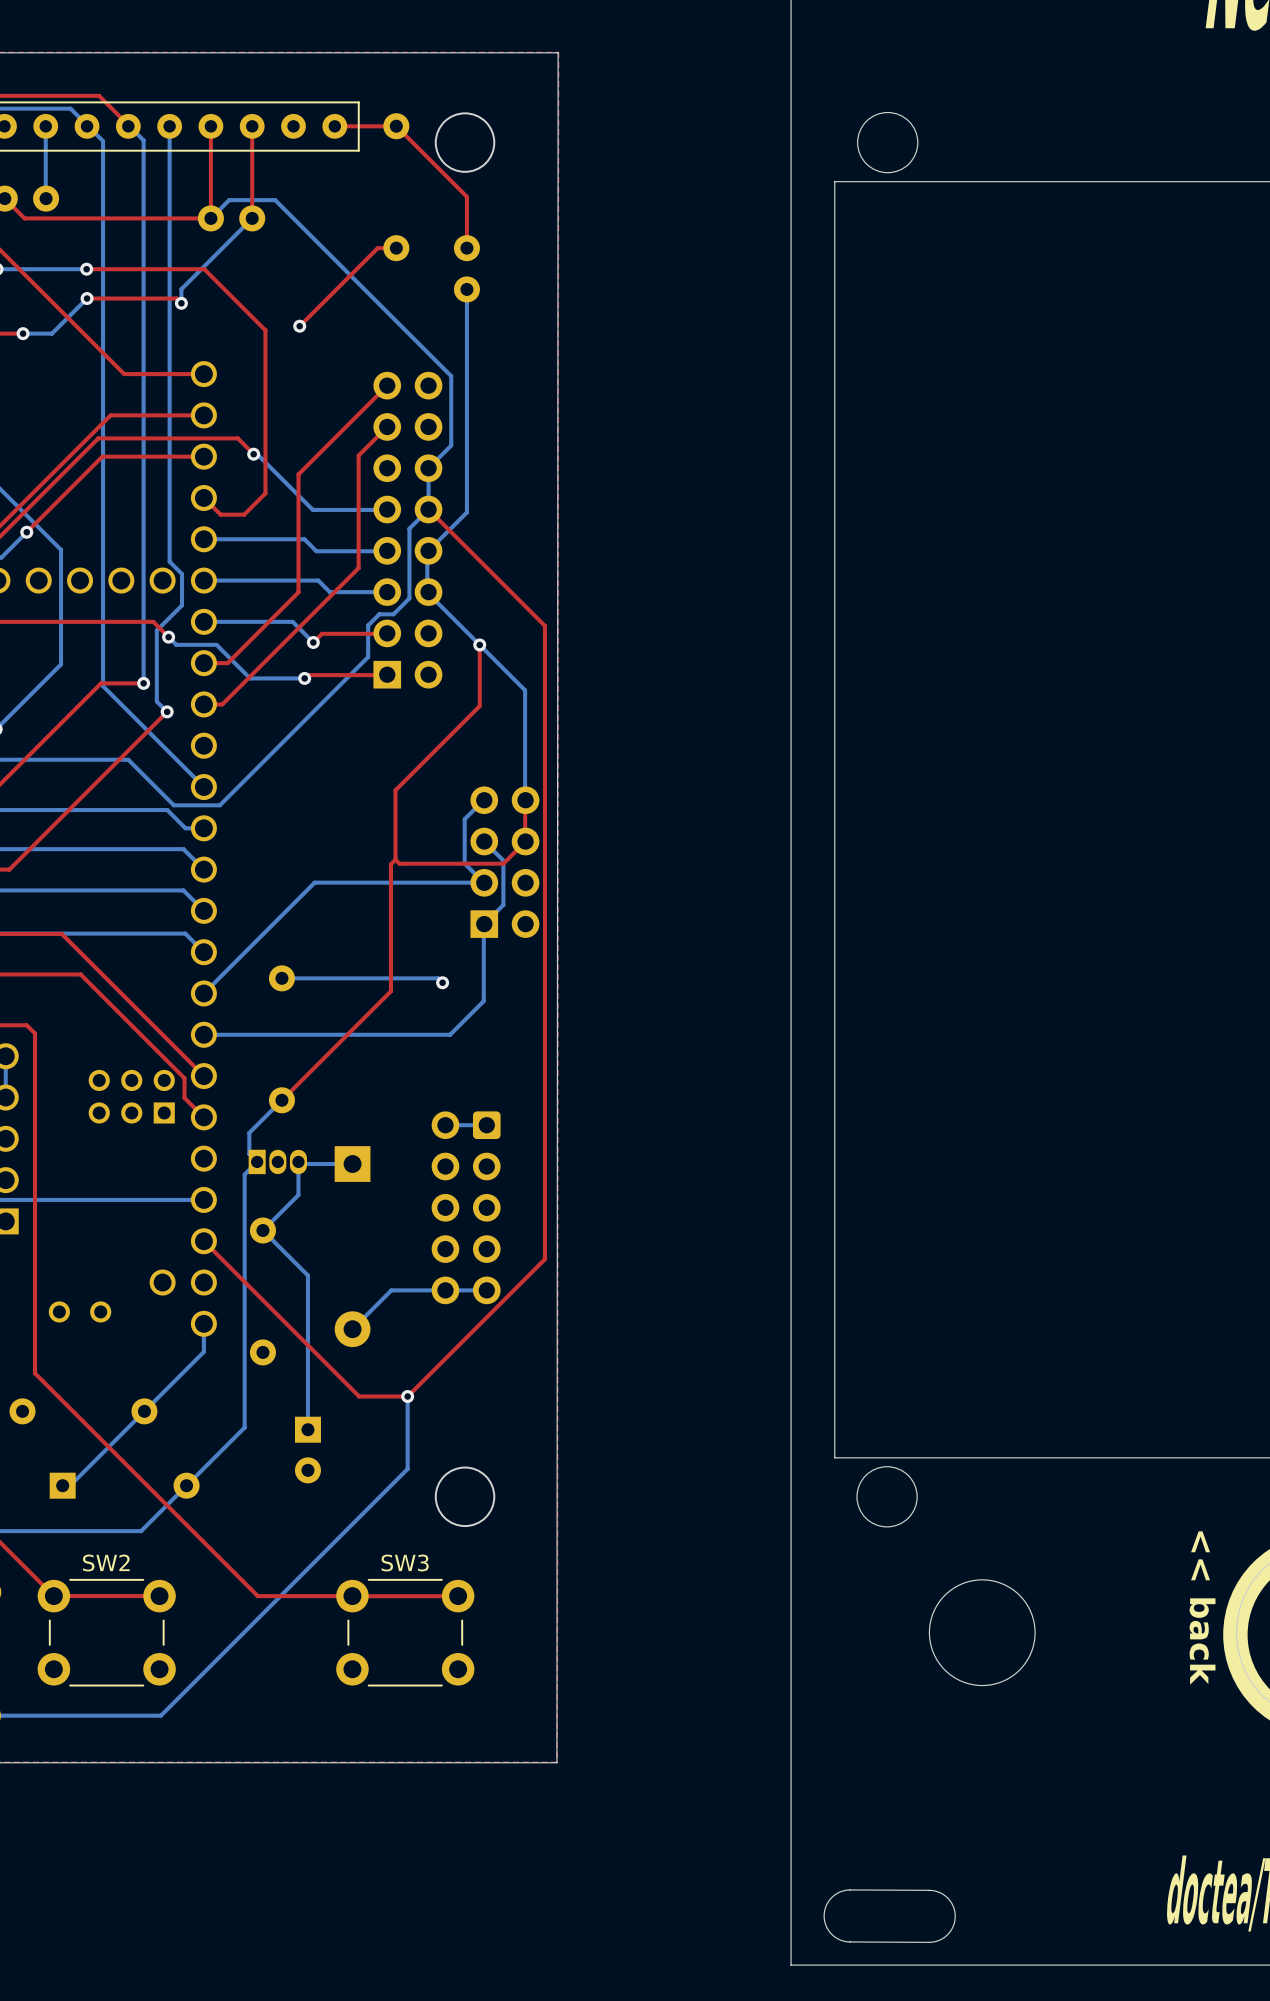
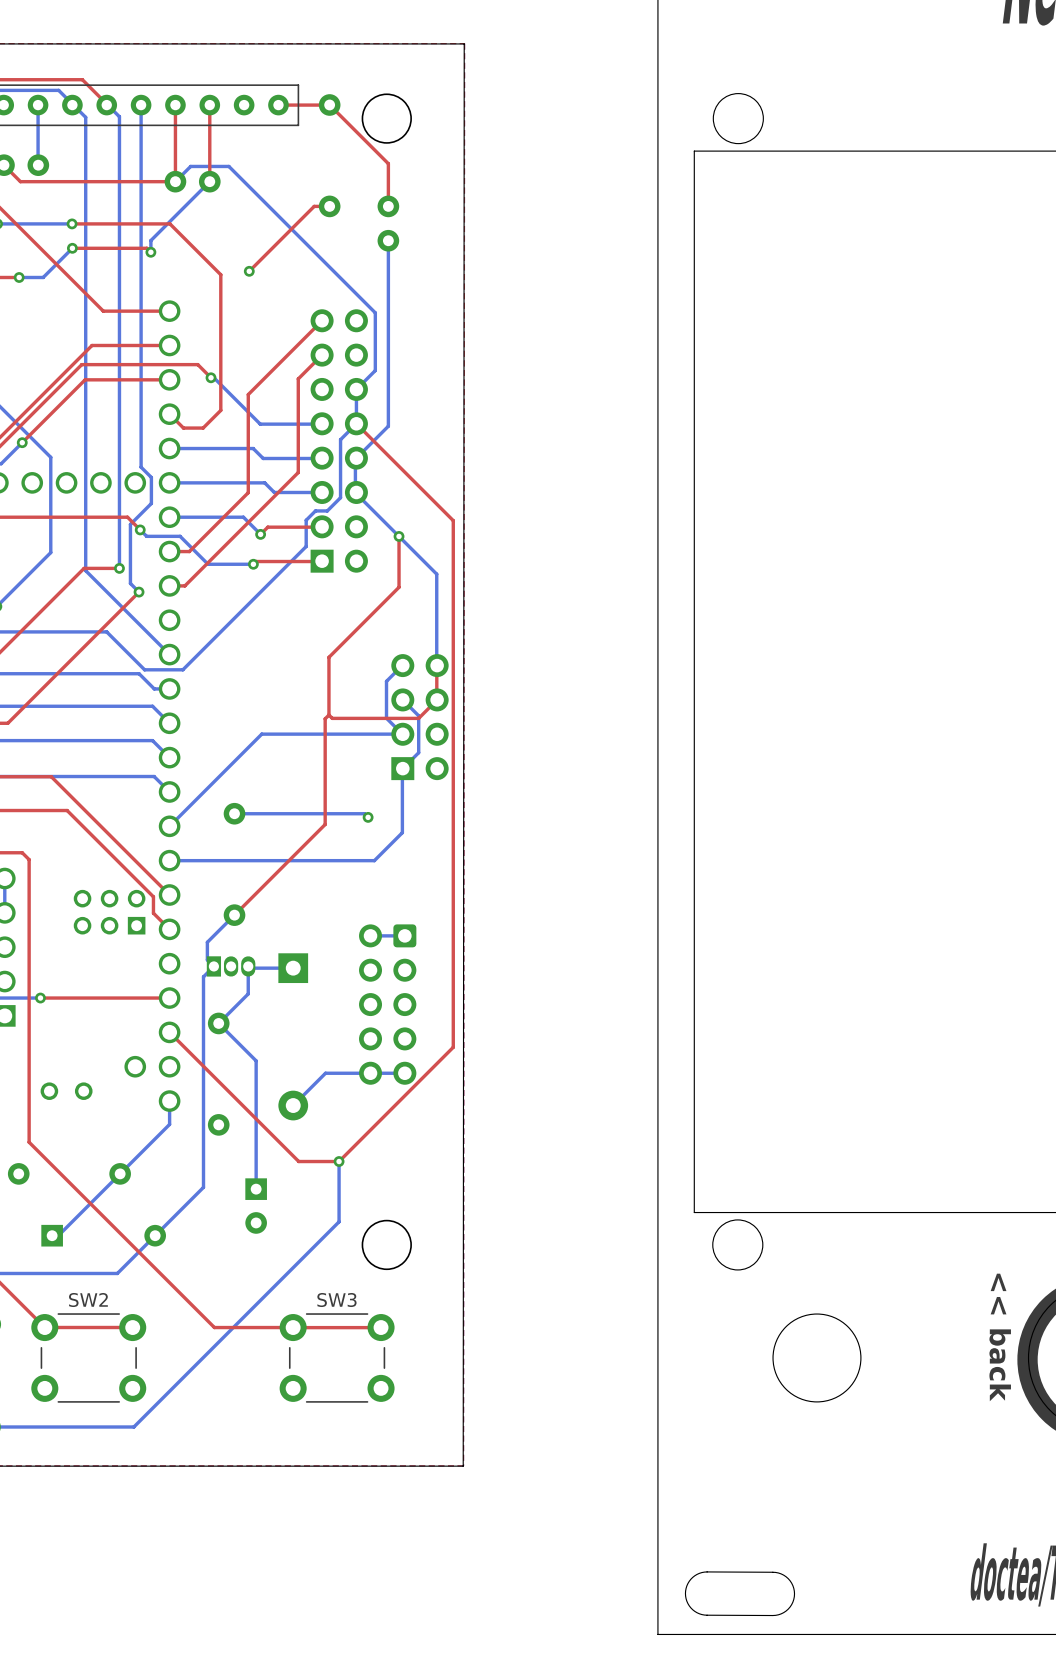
top track: none -> (40, 998) (169, 998)
bottom track: (48, 1199) (203, 1199) -> none
via: none -> (40, 998)

